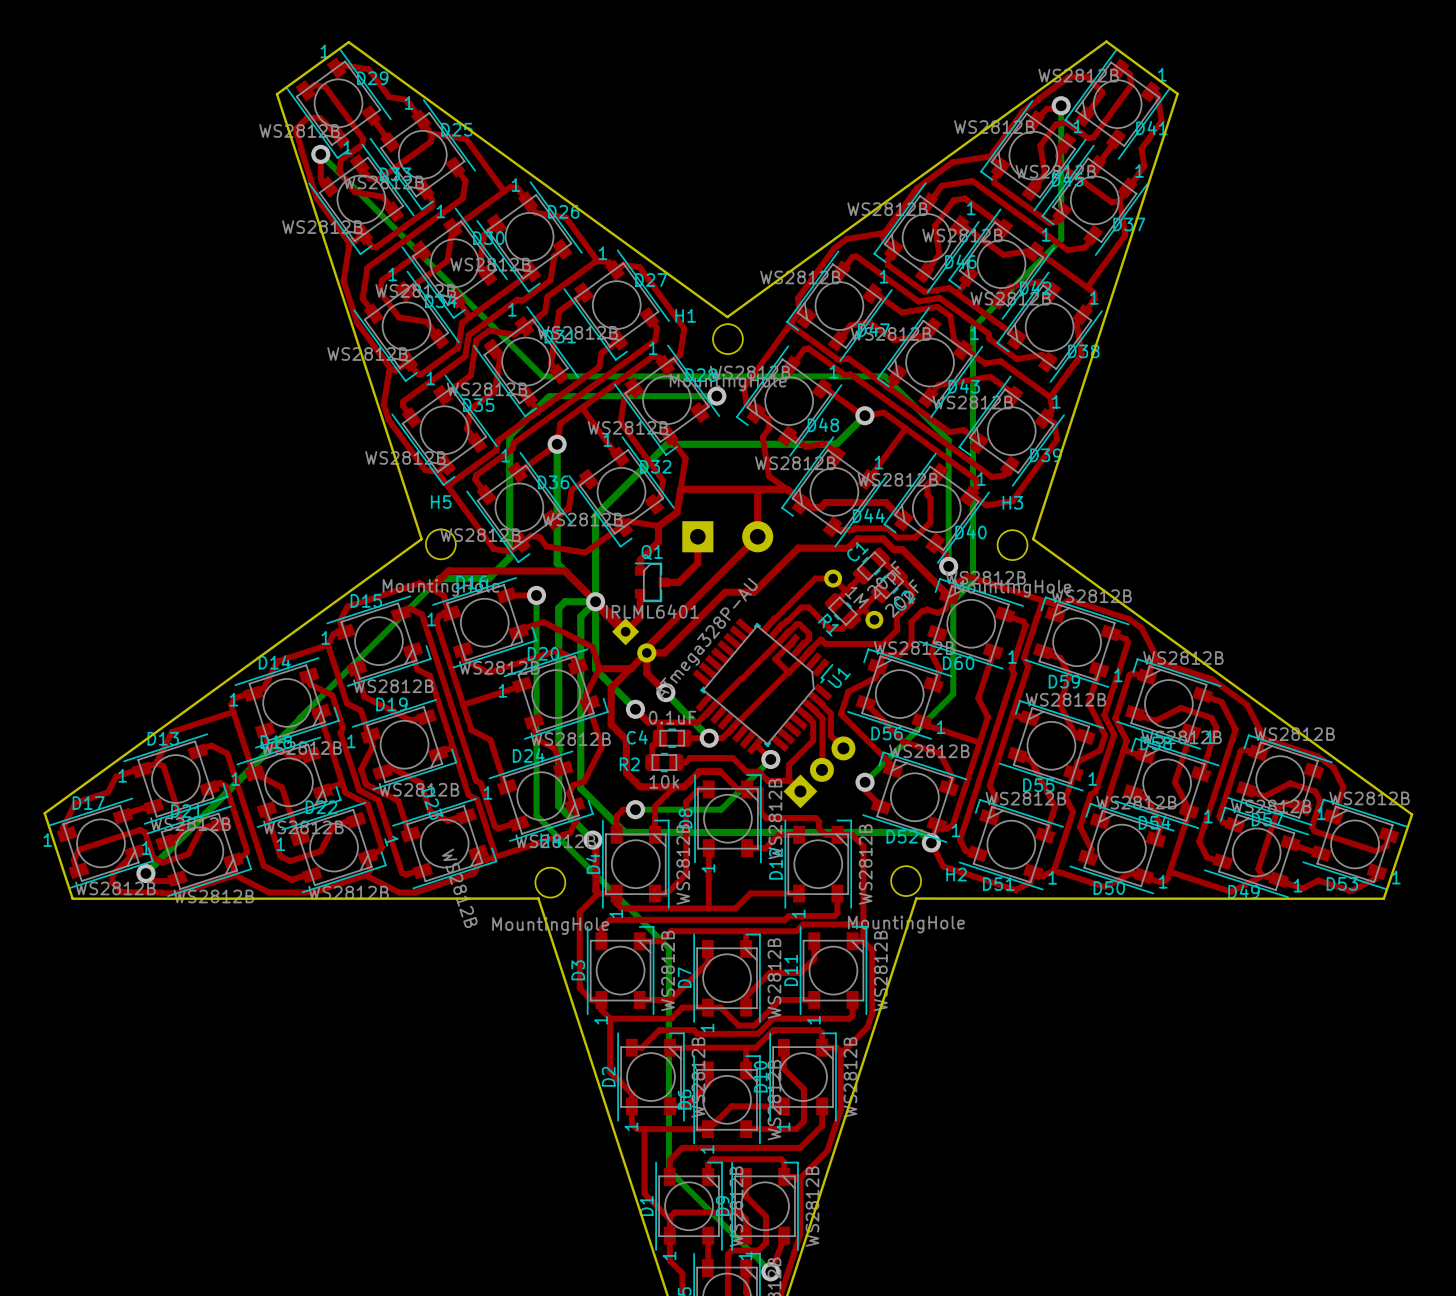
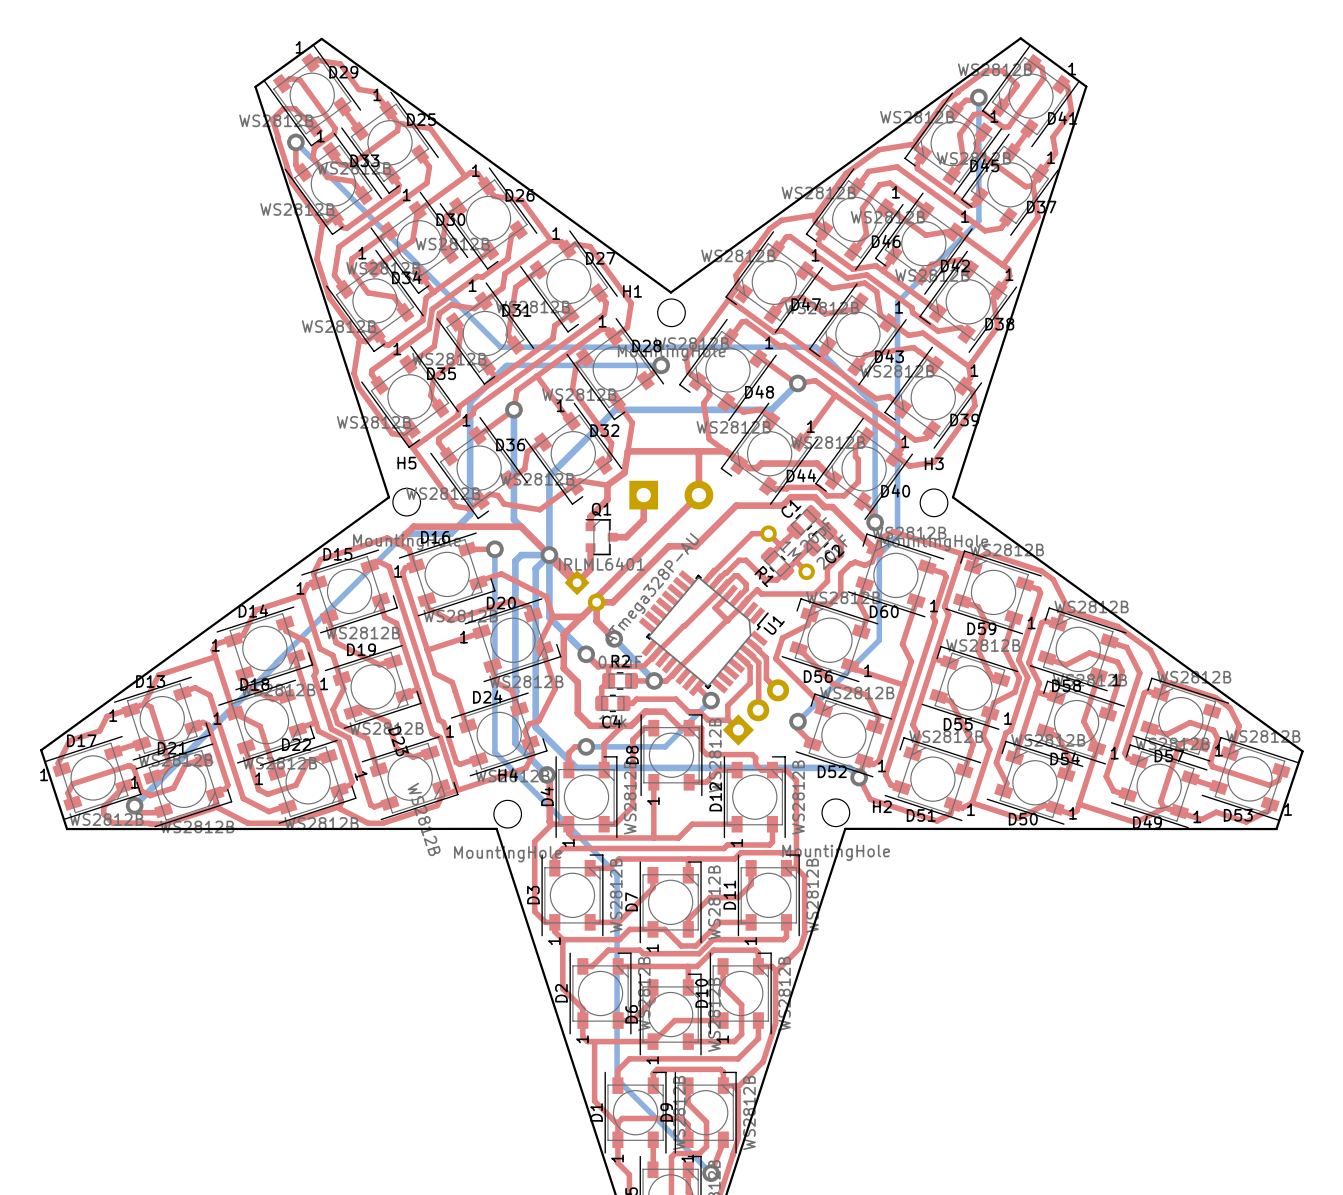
C4 name position: C4 (637, 737) -> C4 (611, 721)
R2 name position: R2 (629, 764) -> R2 (620, 661)

